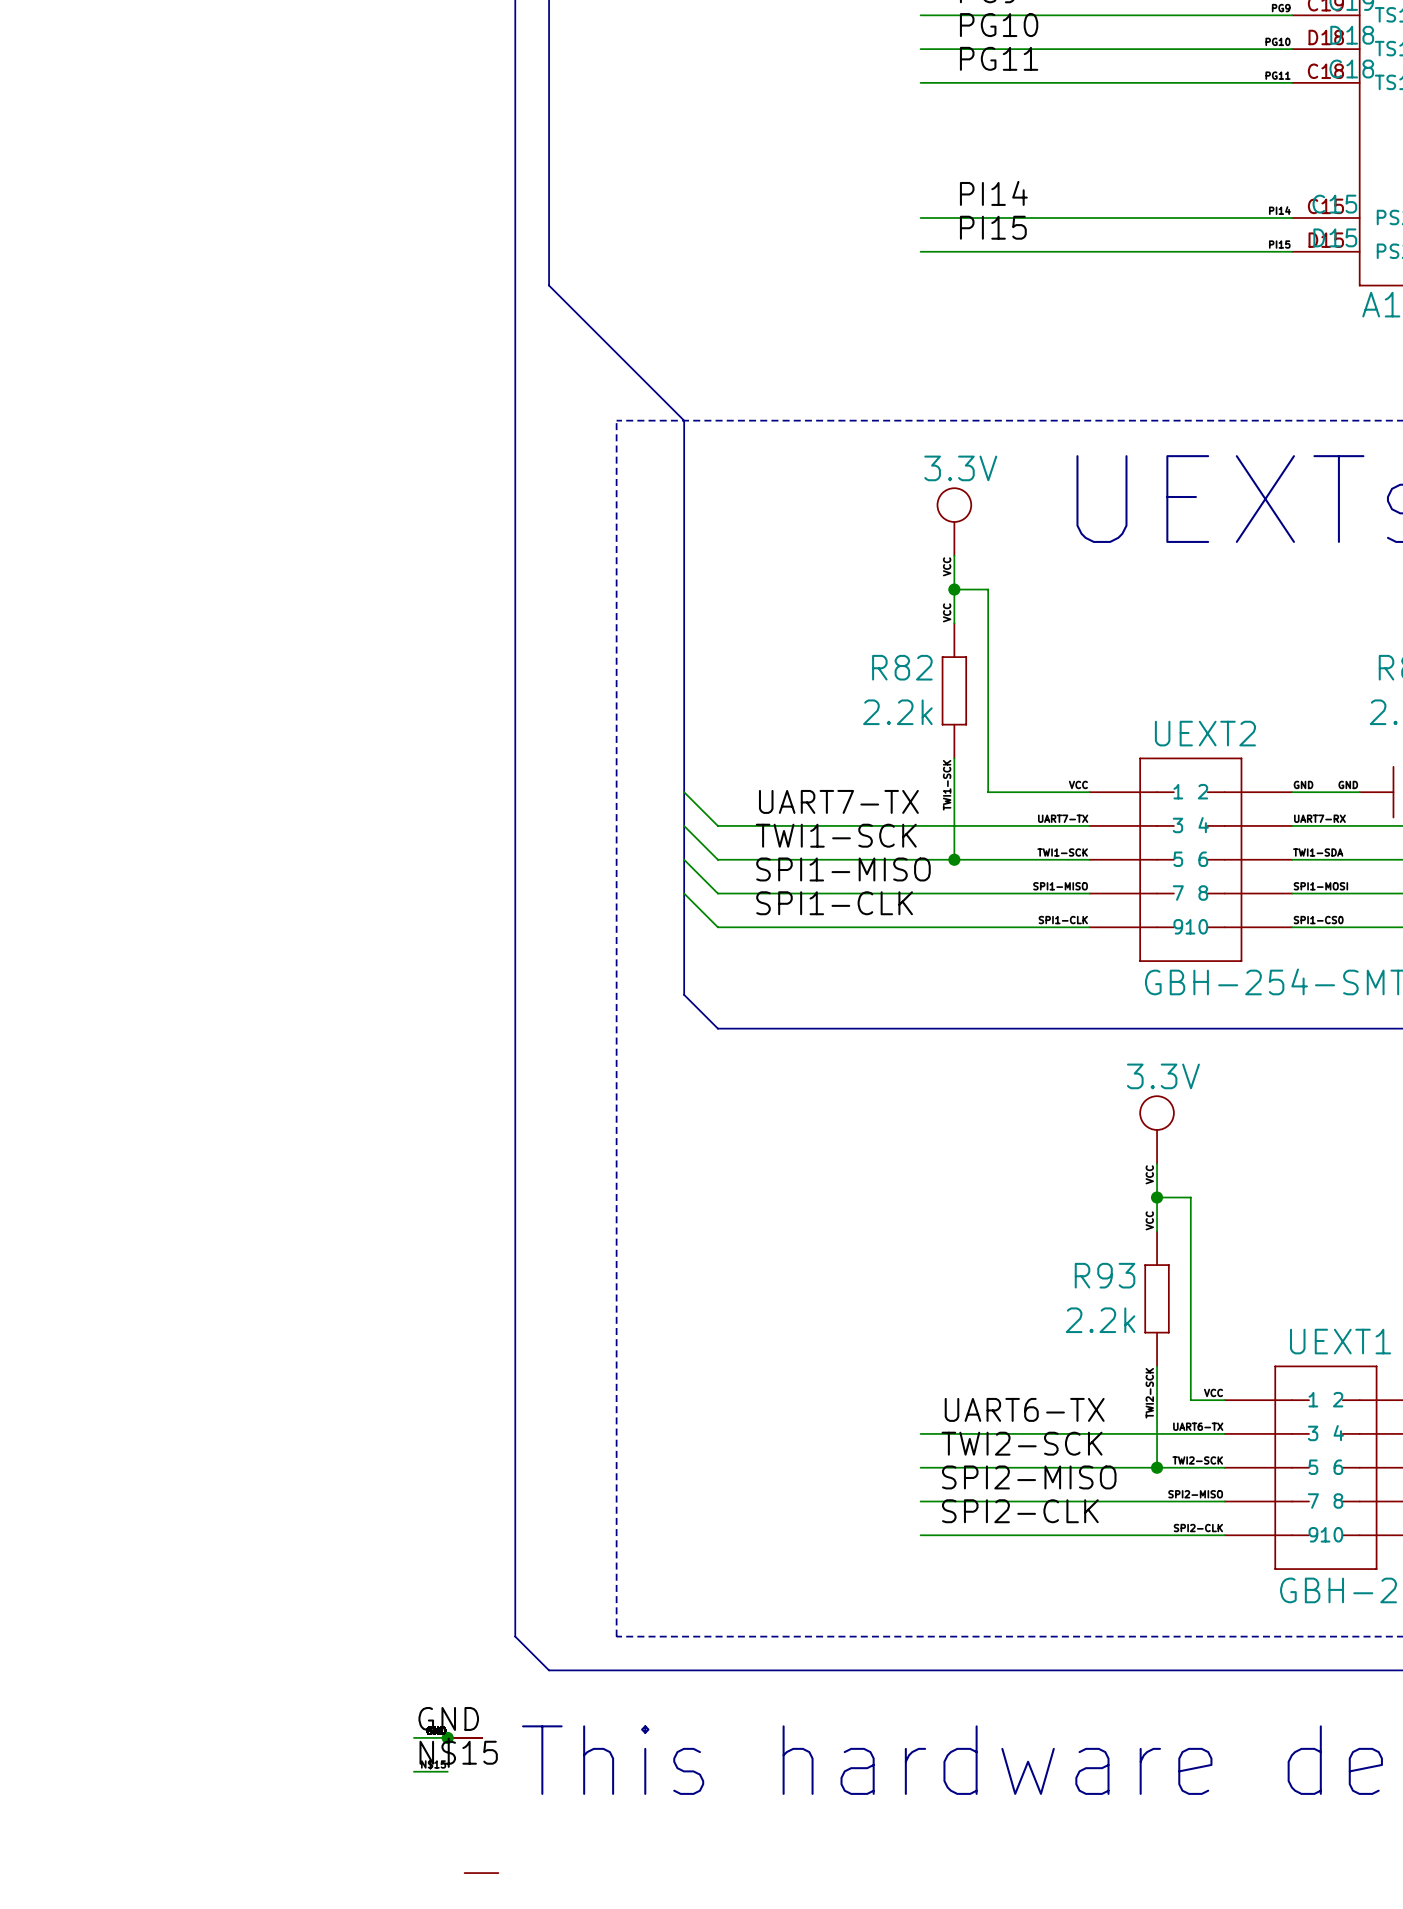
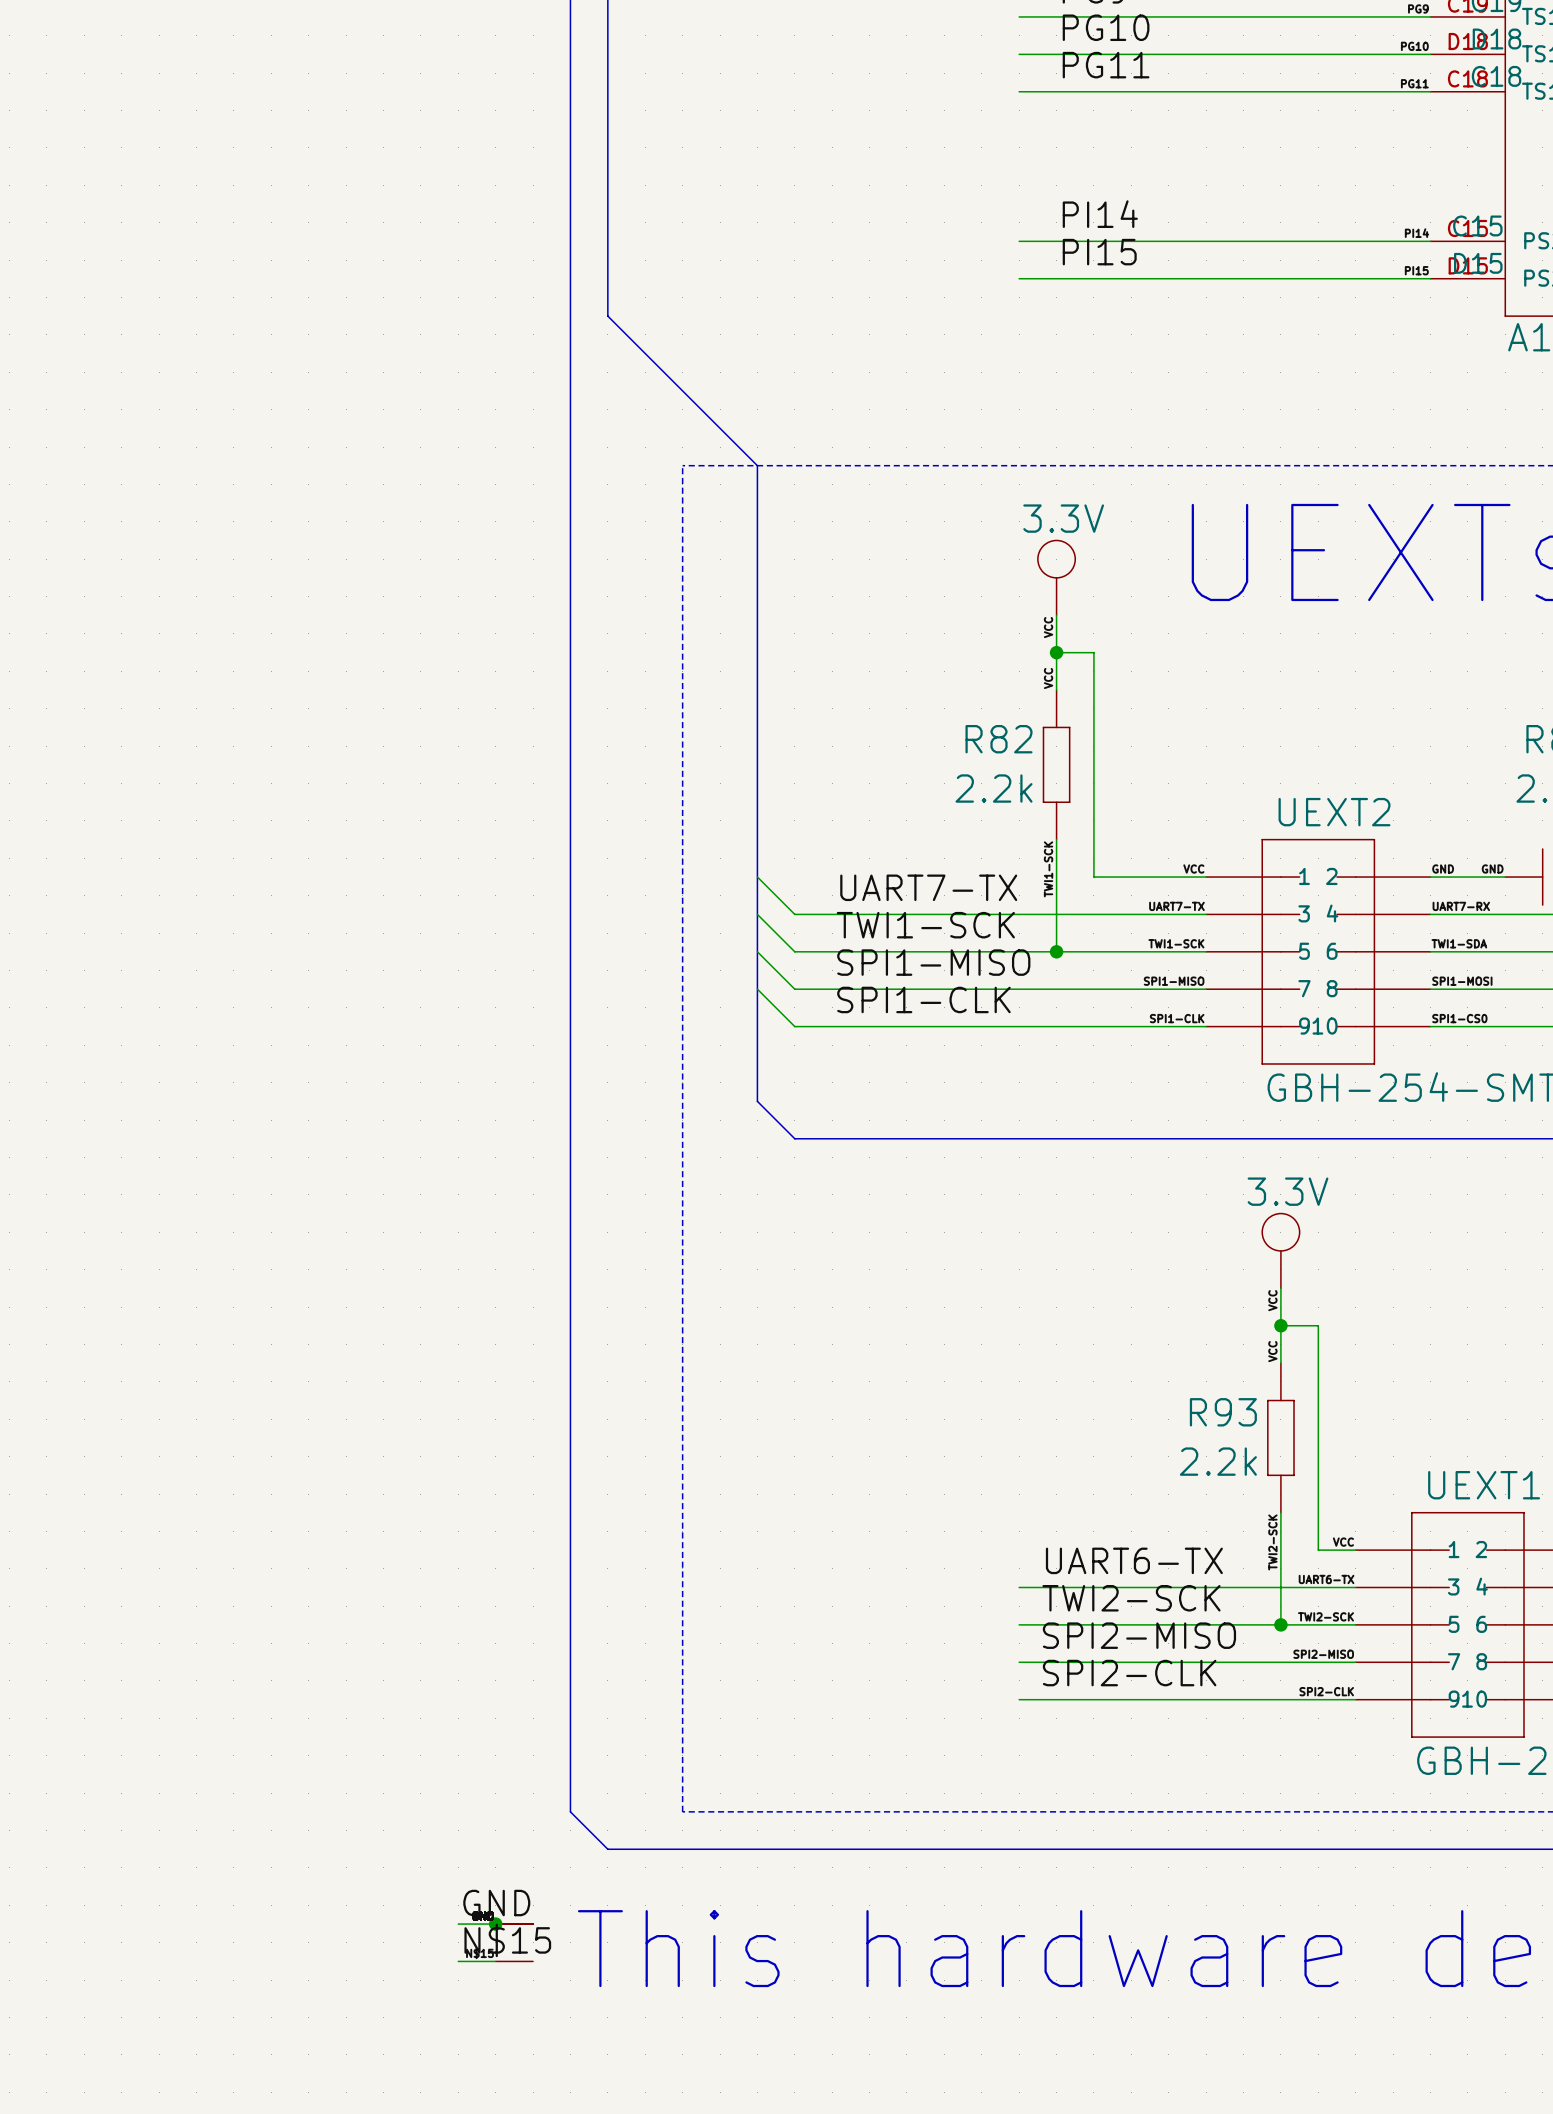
part position: (481, 1873) -> (514, 1961)

